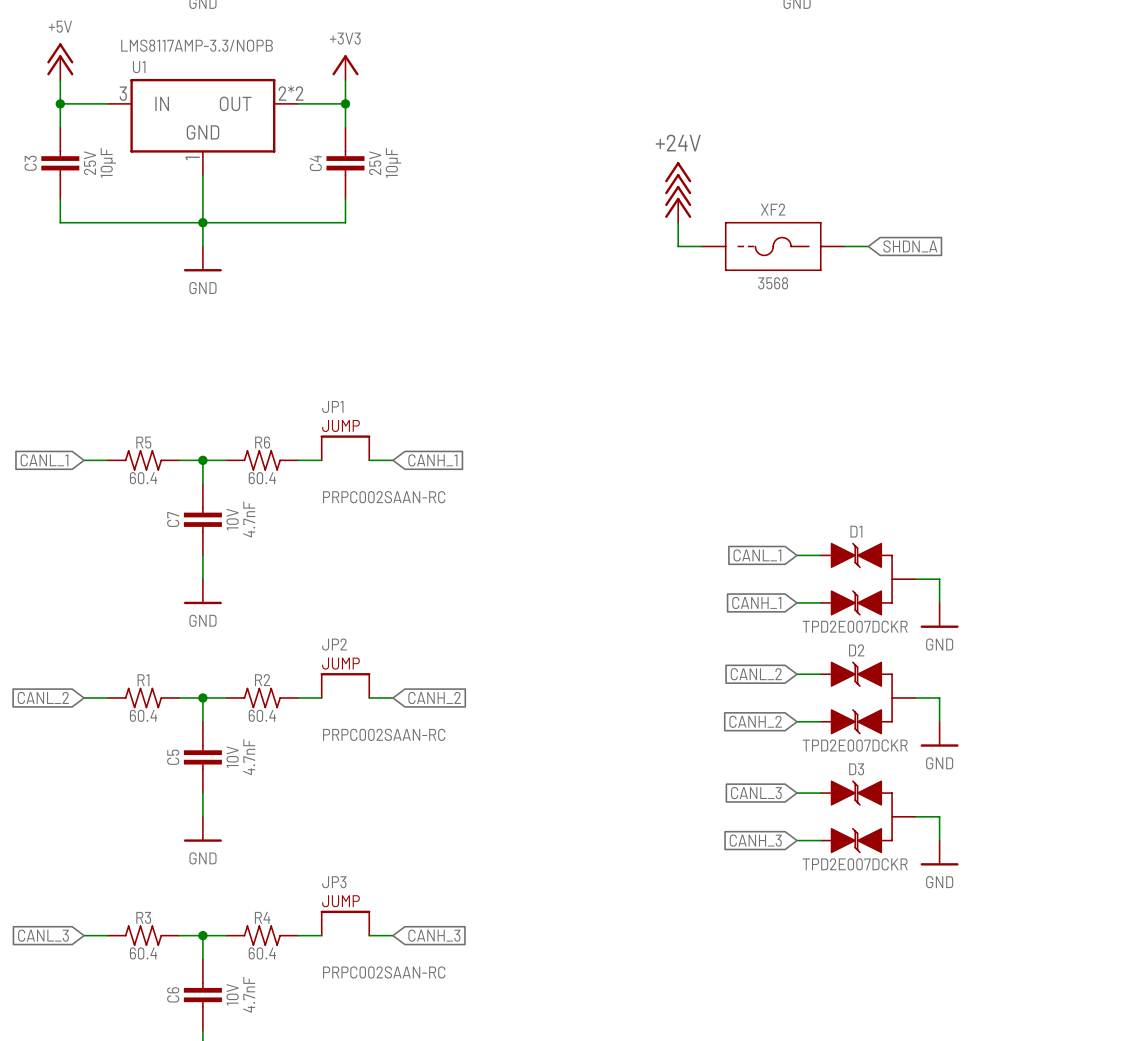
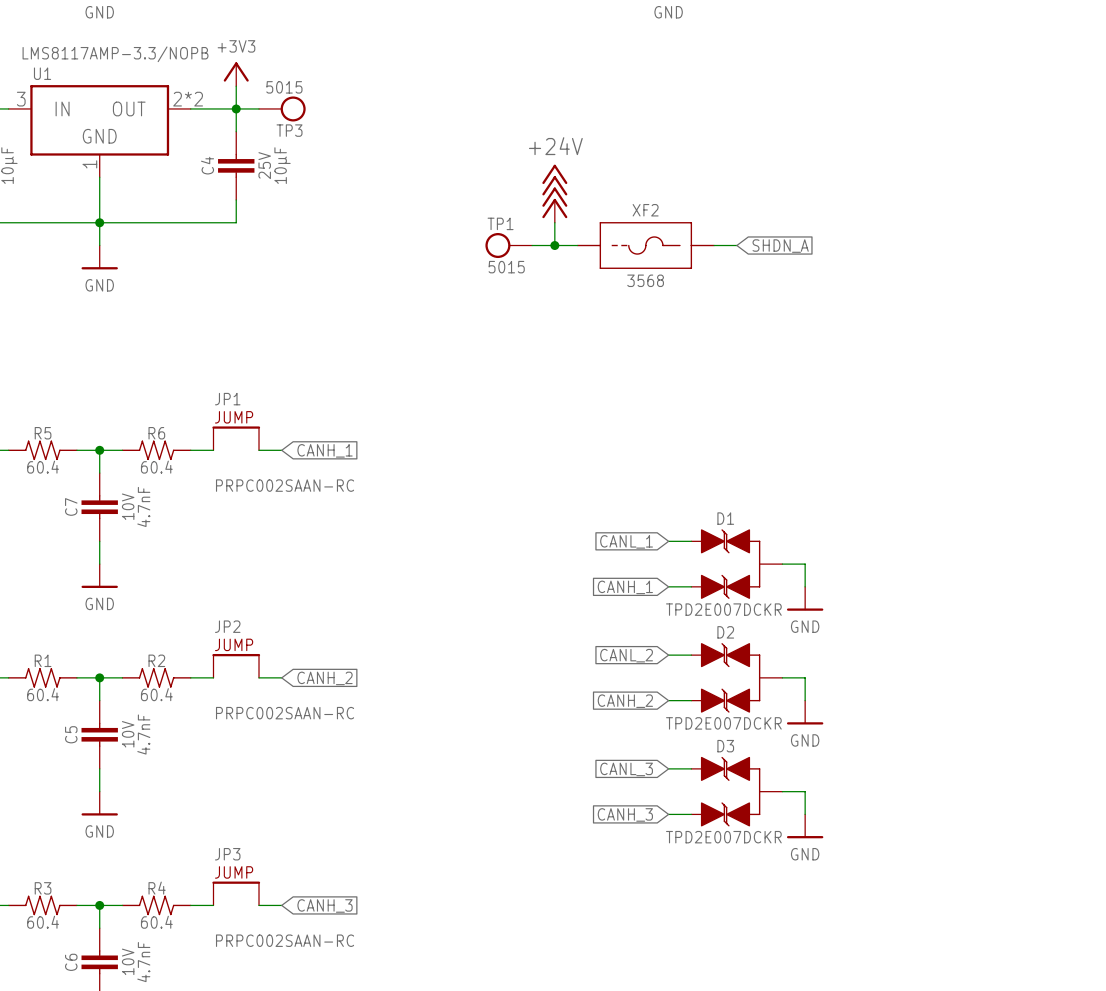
wire: none -> (236, 108) (259, 108)
TP3: none -> (282, 108)
TP1: none -> (508, 245)
wire: none -> (532, 245) (554, 245)
junction: none -> (554, 245)

